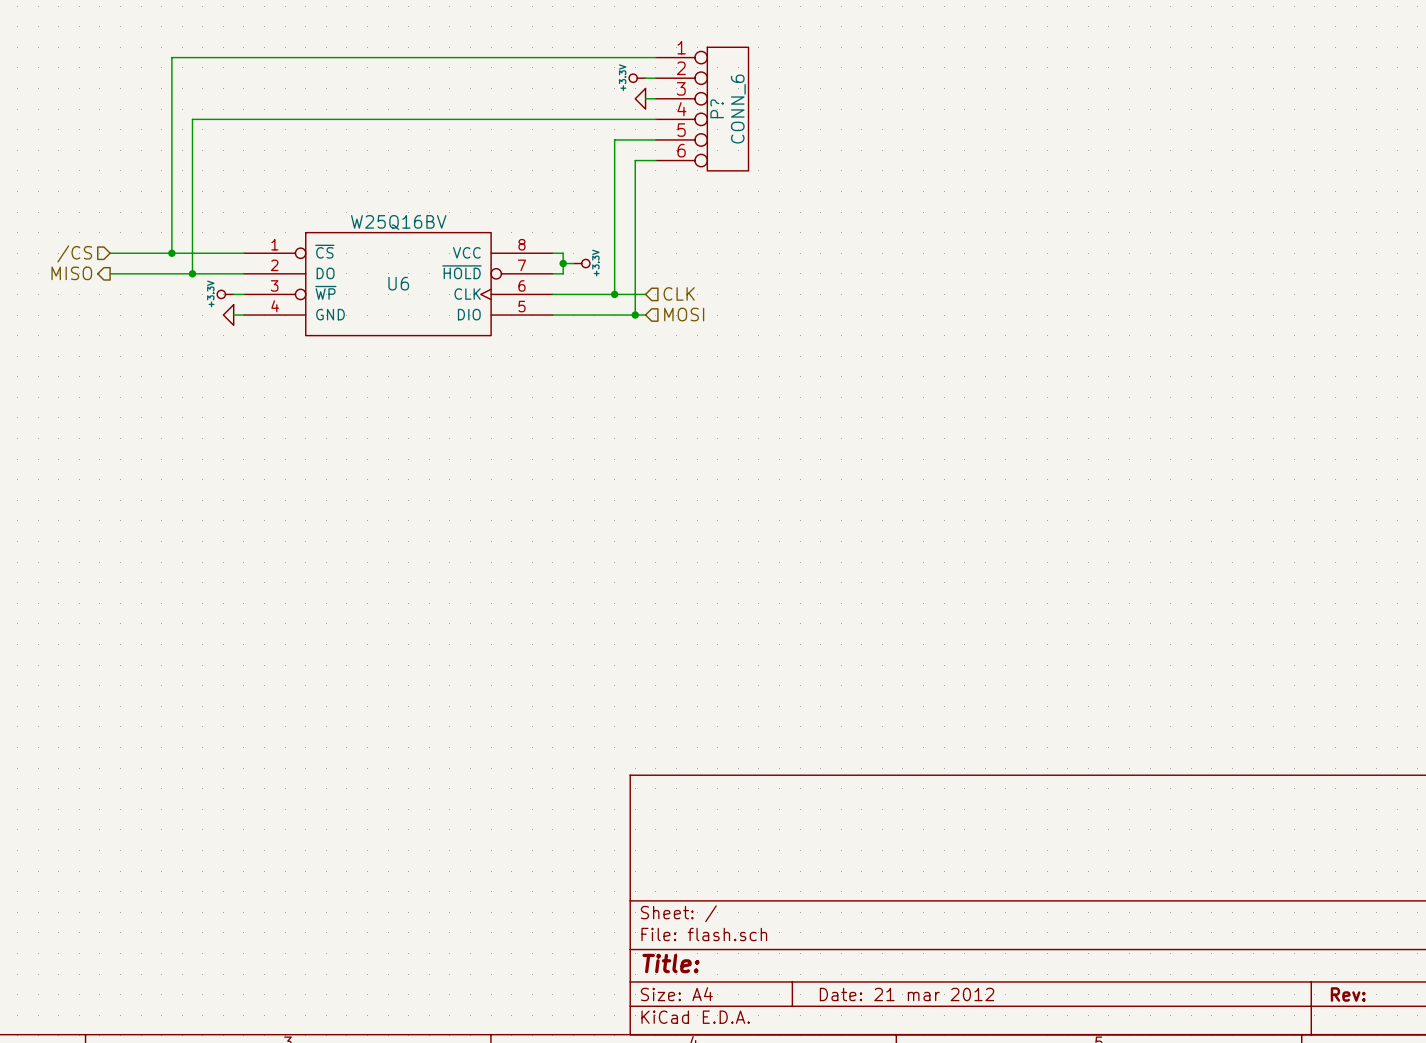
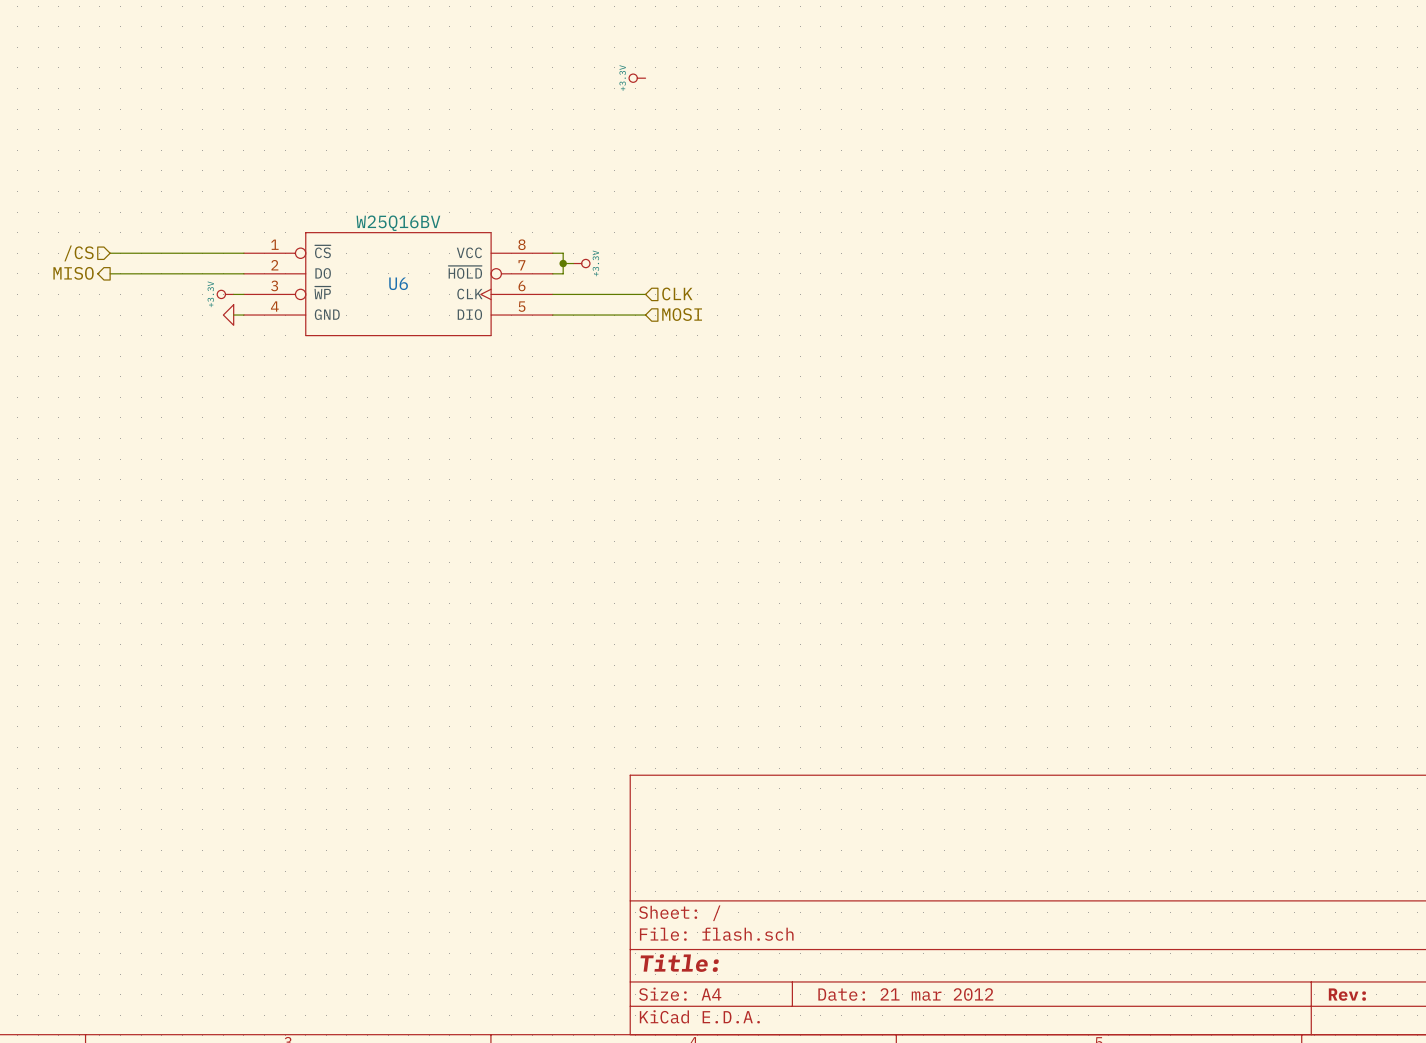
wire: (655, 57) (171, 57) (171, 253) -> none
wire: (645, 78) (655, 78) -> none
power symbol: (640, 98) -> none
wire: (645, 98) (655, 98) -> none
P?: CONN_6 (702, 109) -> none
wire: (655, 119) (192, 119) (192, 273) -> none
wire: (655, 139) (614, 139) (614, 294) -> none
wire: (655, 160) (635, 160) (635, 315) -> none
junction: (171, 253) -> none
junction: (192, 273) -> none
junction: (614, 294) -> none
junction: (635, 315) -> none

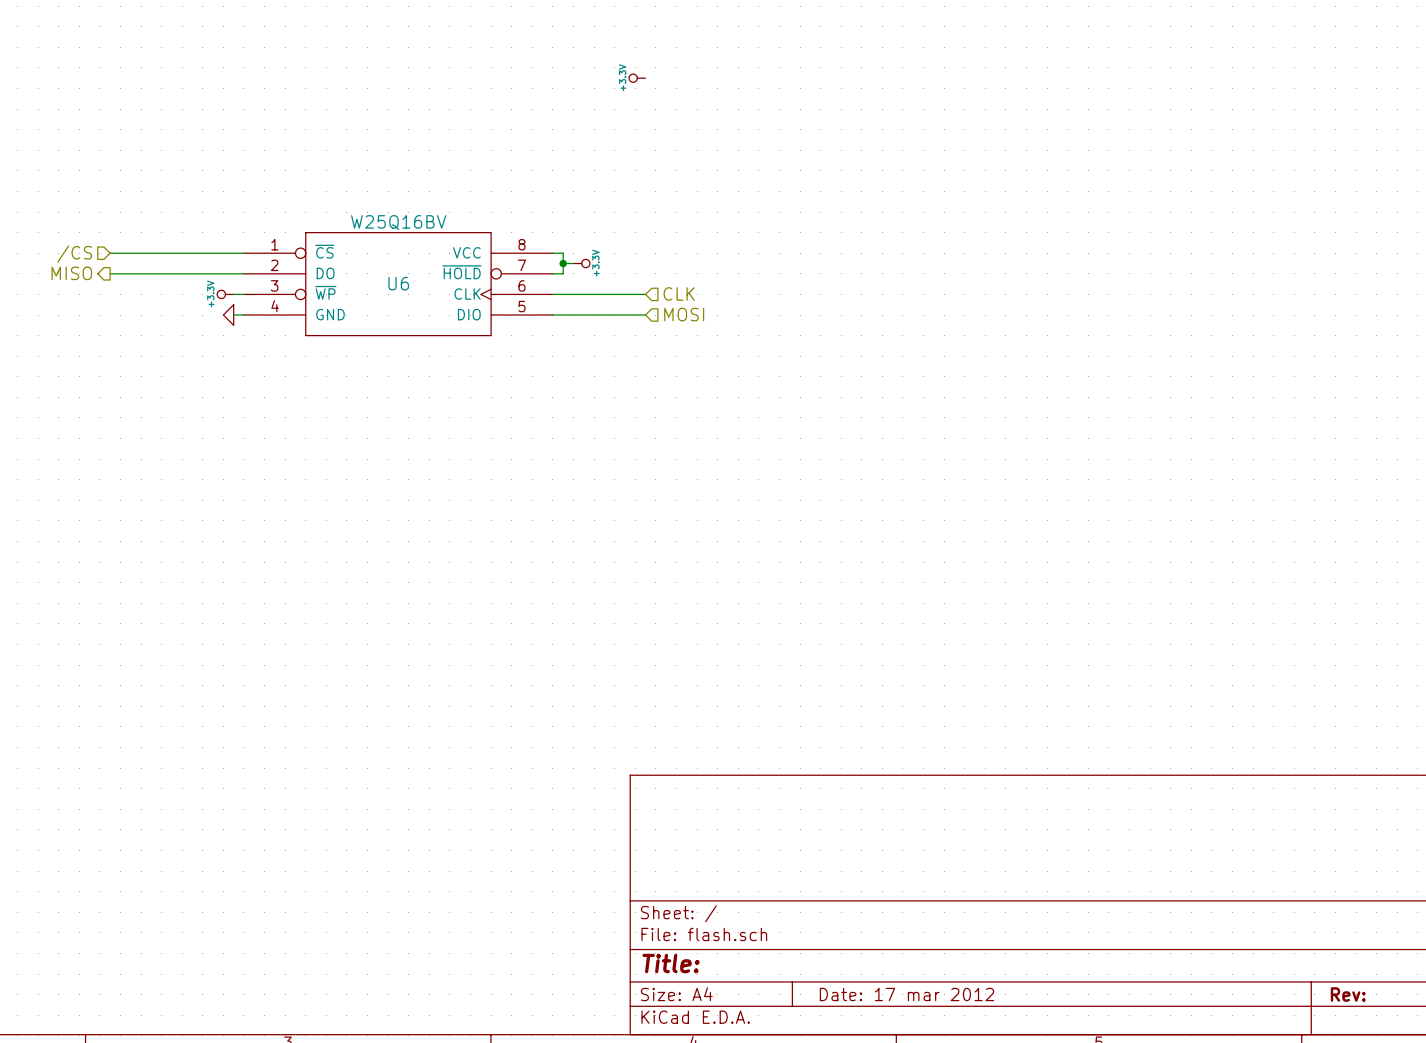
title block: Date: 21 mar 2012 (905, 994) -> Date: 17 mar 2012 (907, 994)

